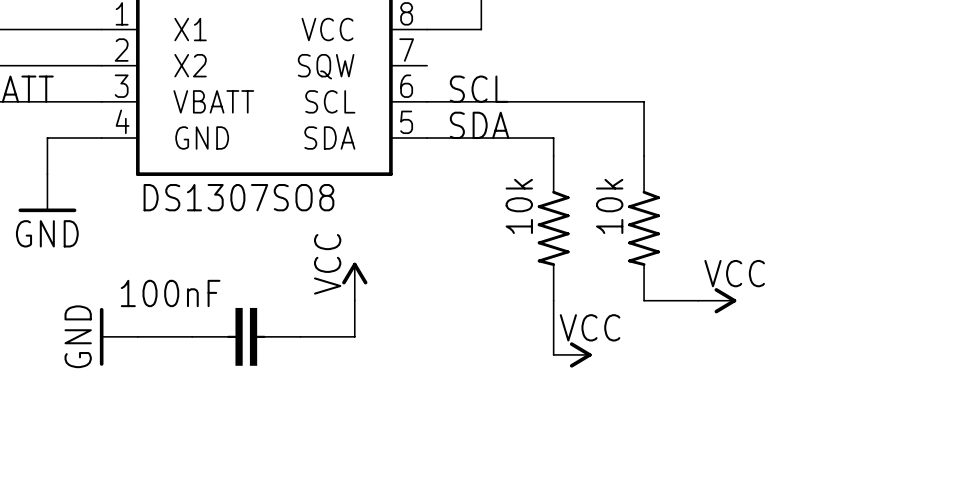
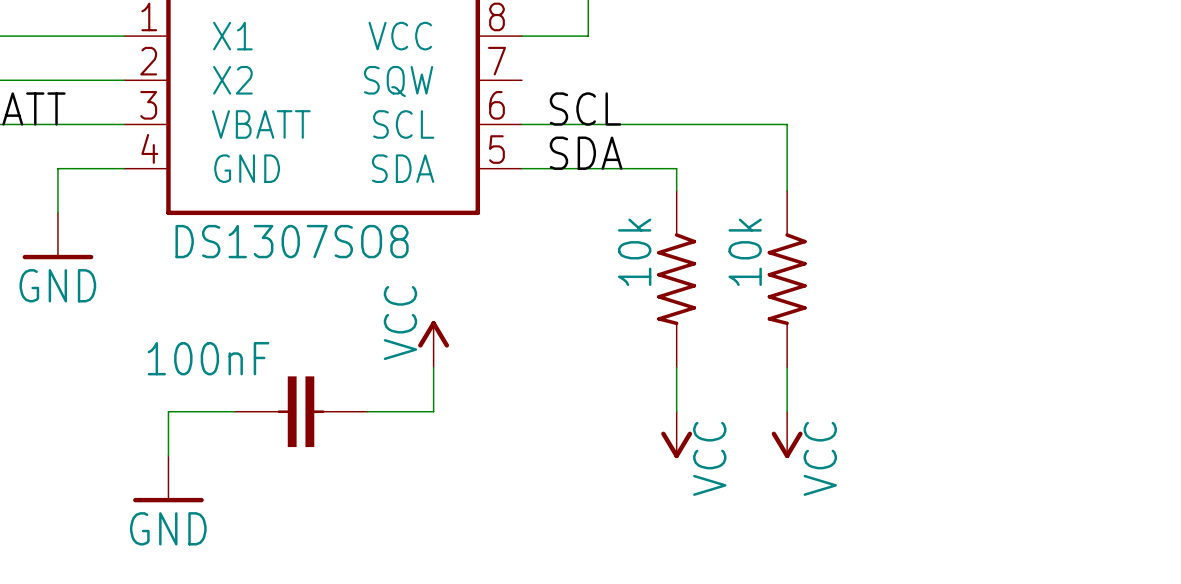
wire: (644, 300) (698, 300) -> (787, 367) (787, 411)
power symbol: VCC (717, 300) -> none
power symbol rotation: 0° (101, 336) -> 90° counterclockwise (168, 500)
power symbol position: GND (118, 336) -> GND (168, 479)
wire: none -> (168, 411) (168, 455)
power symbol rotation: 0° (580, 354) -> 90° clockwise (676, 444)
power symbol: none -> VCC (787, 434)

